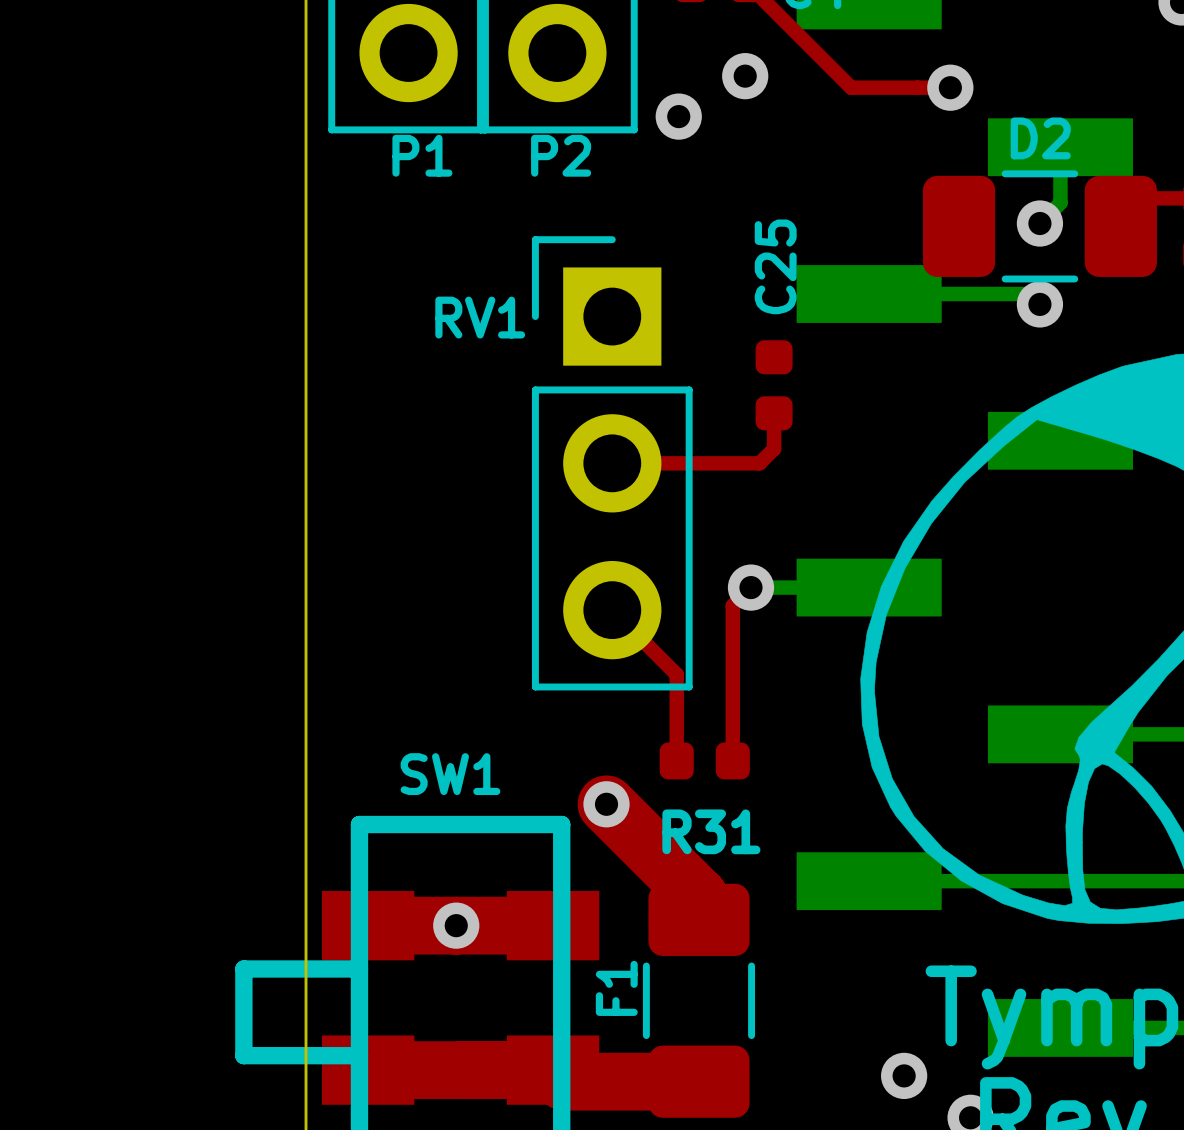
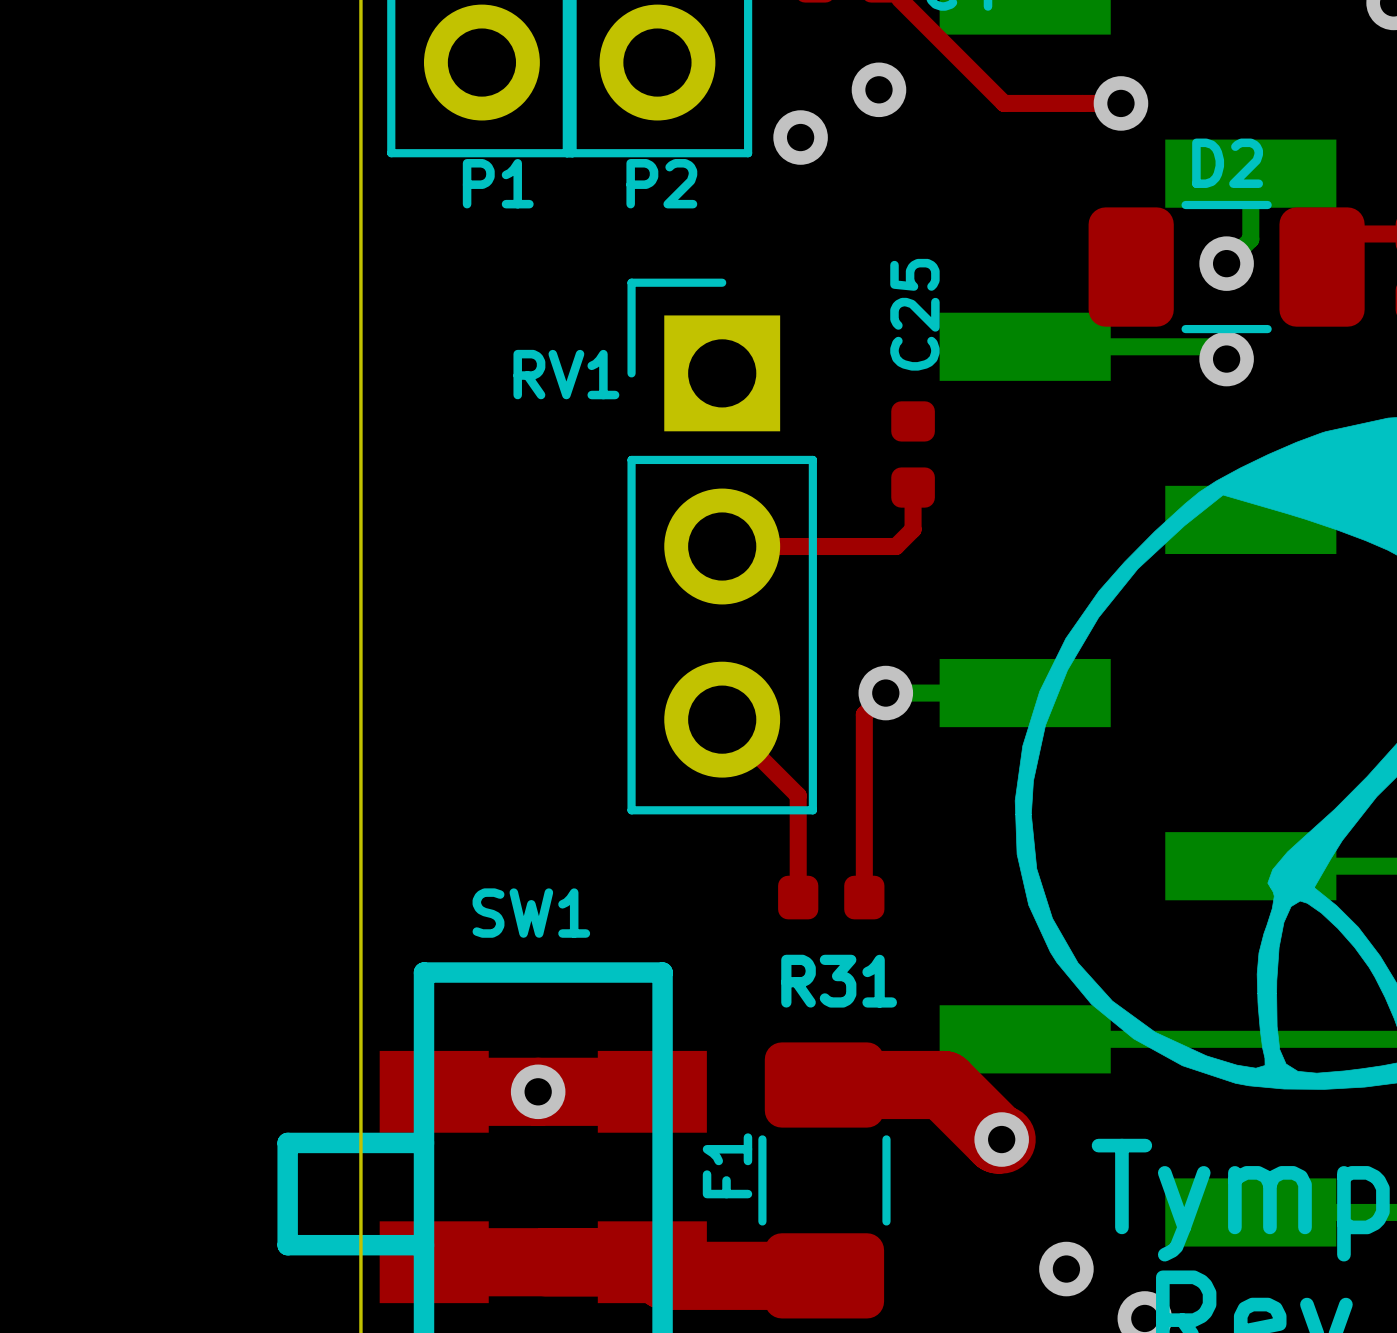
top track: (606, 804) (698, 896) (698, 919) -> (1001, 1139) (998, 1139) (943, 1085) (824, 1085)
via: (606, 804) -> none
via: none -> (1001, 1139)

